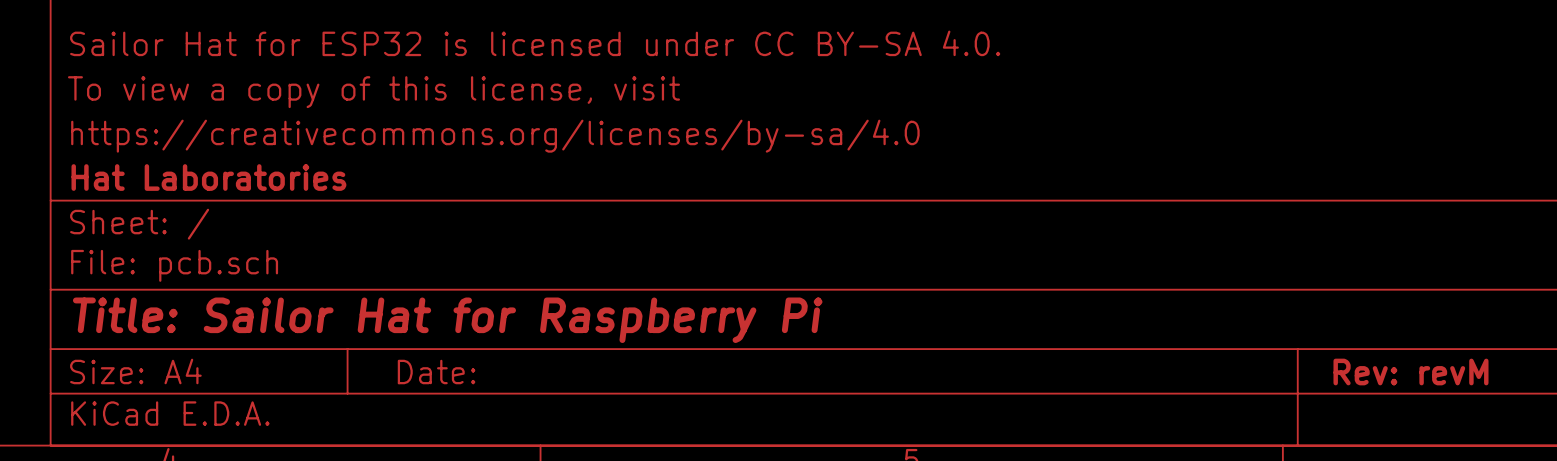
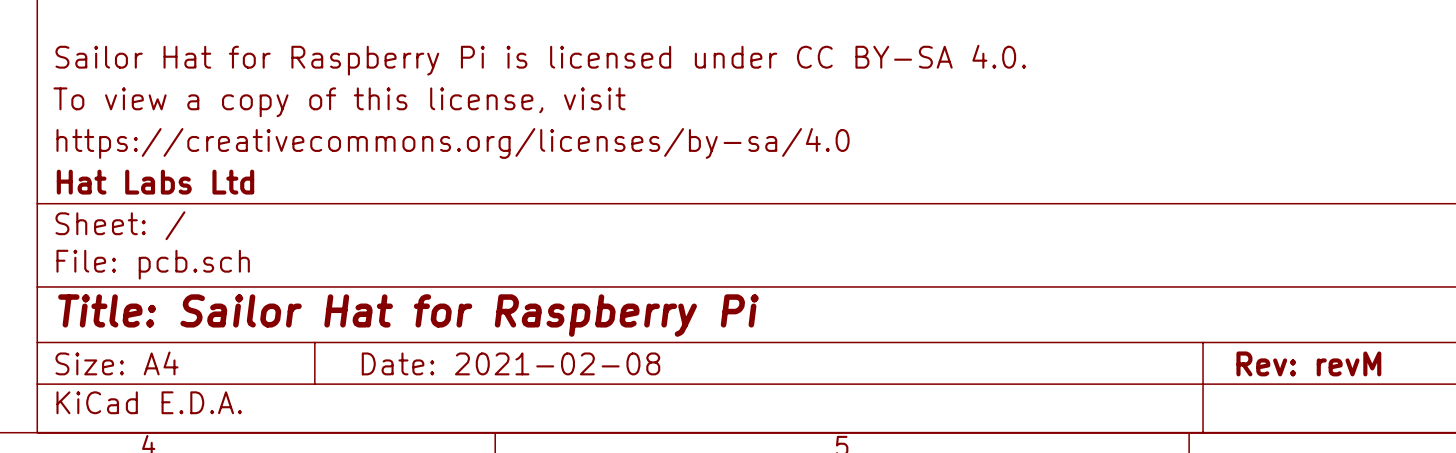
title block: Sailor Hat for ESP32 is licensed under CC BY-SA 4.0. (535, 43) -> Sailor Hat for Raspberry Pi is licensed under CC BY-SA 4.0. (540, 60)
title block: Hat Laboratories (208, 177) -> Hat Labs Ltd (155, 182)
title block: Date: (436, 372) -> Date: 2021-02-08 (511, 363)

